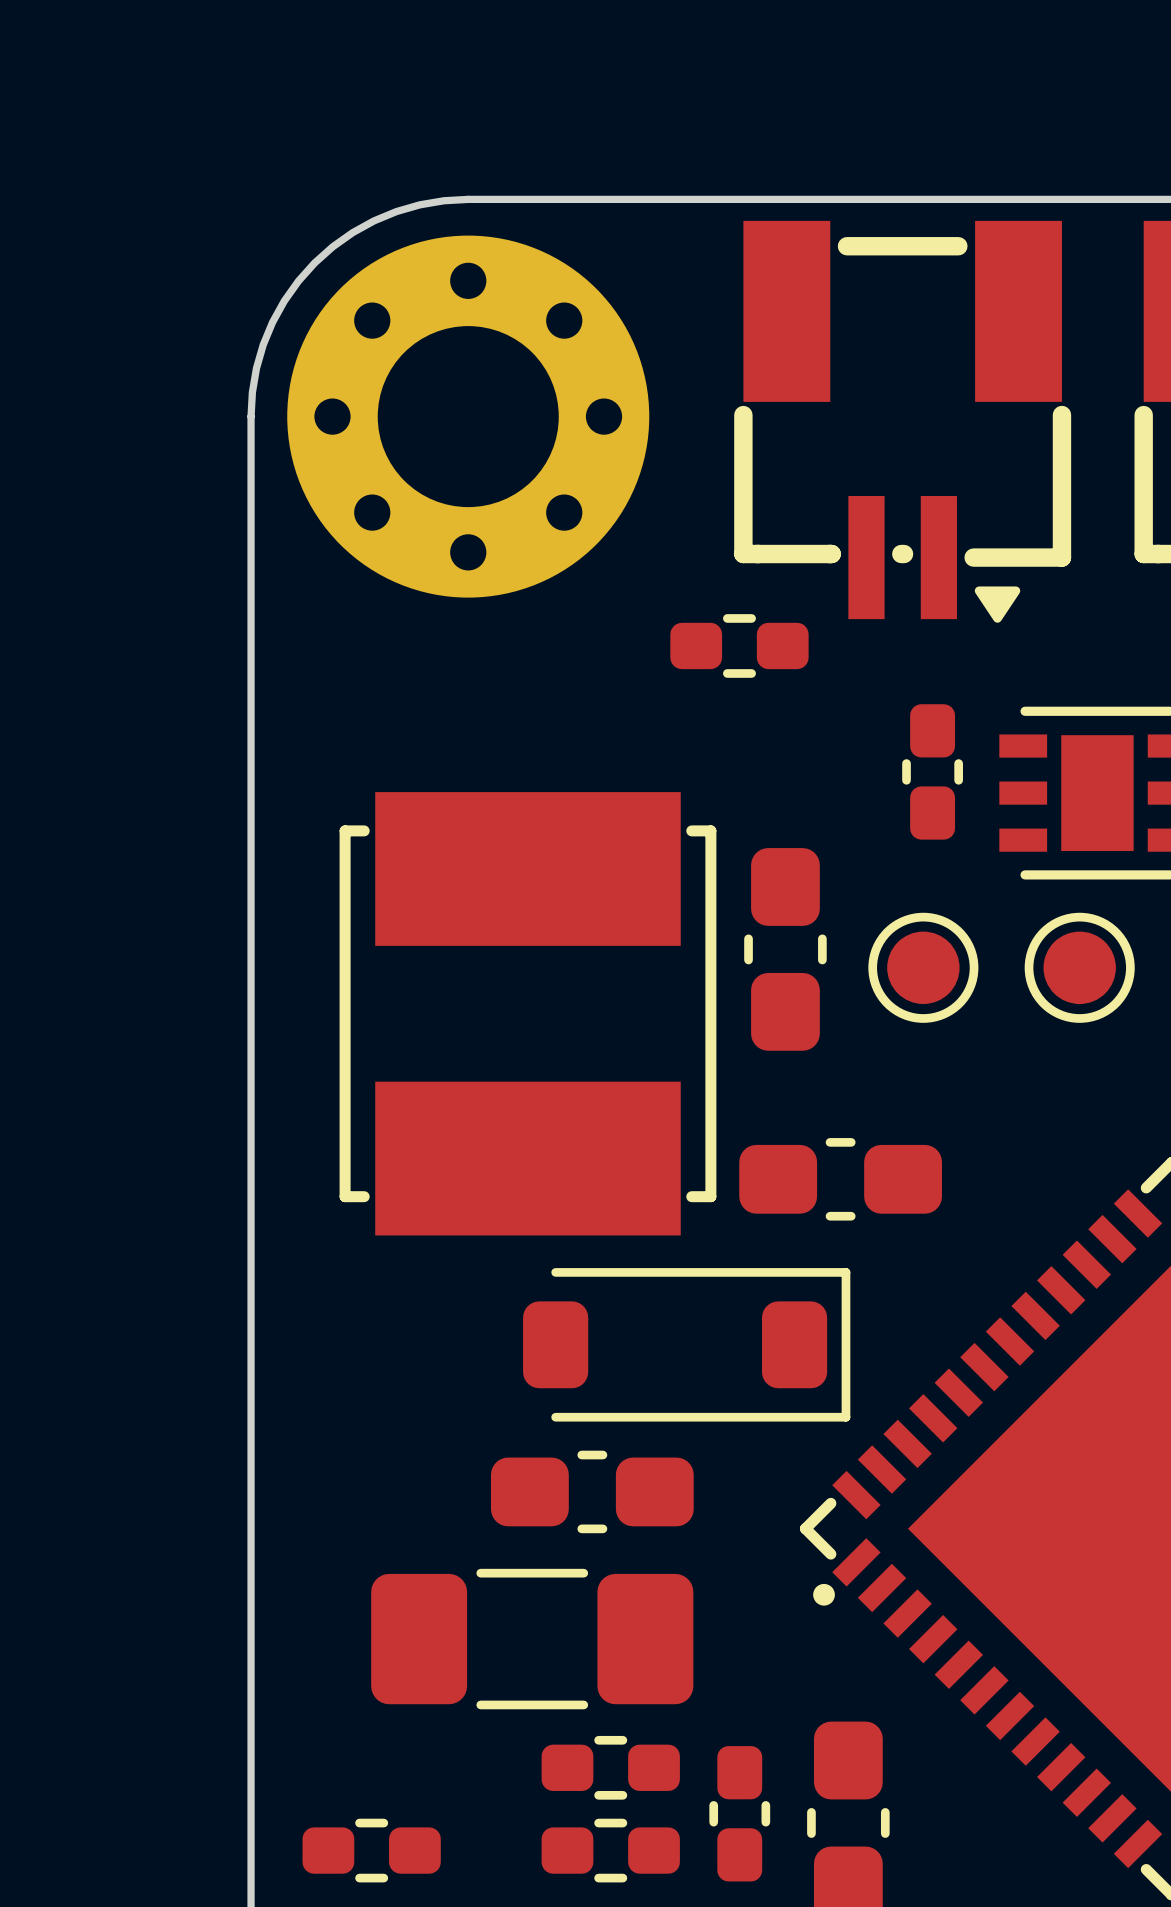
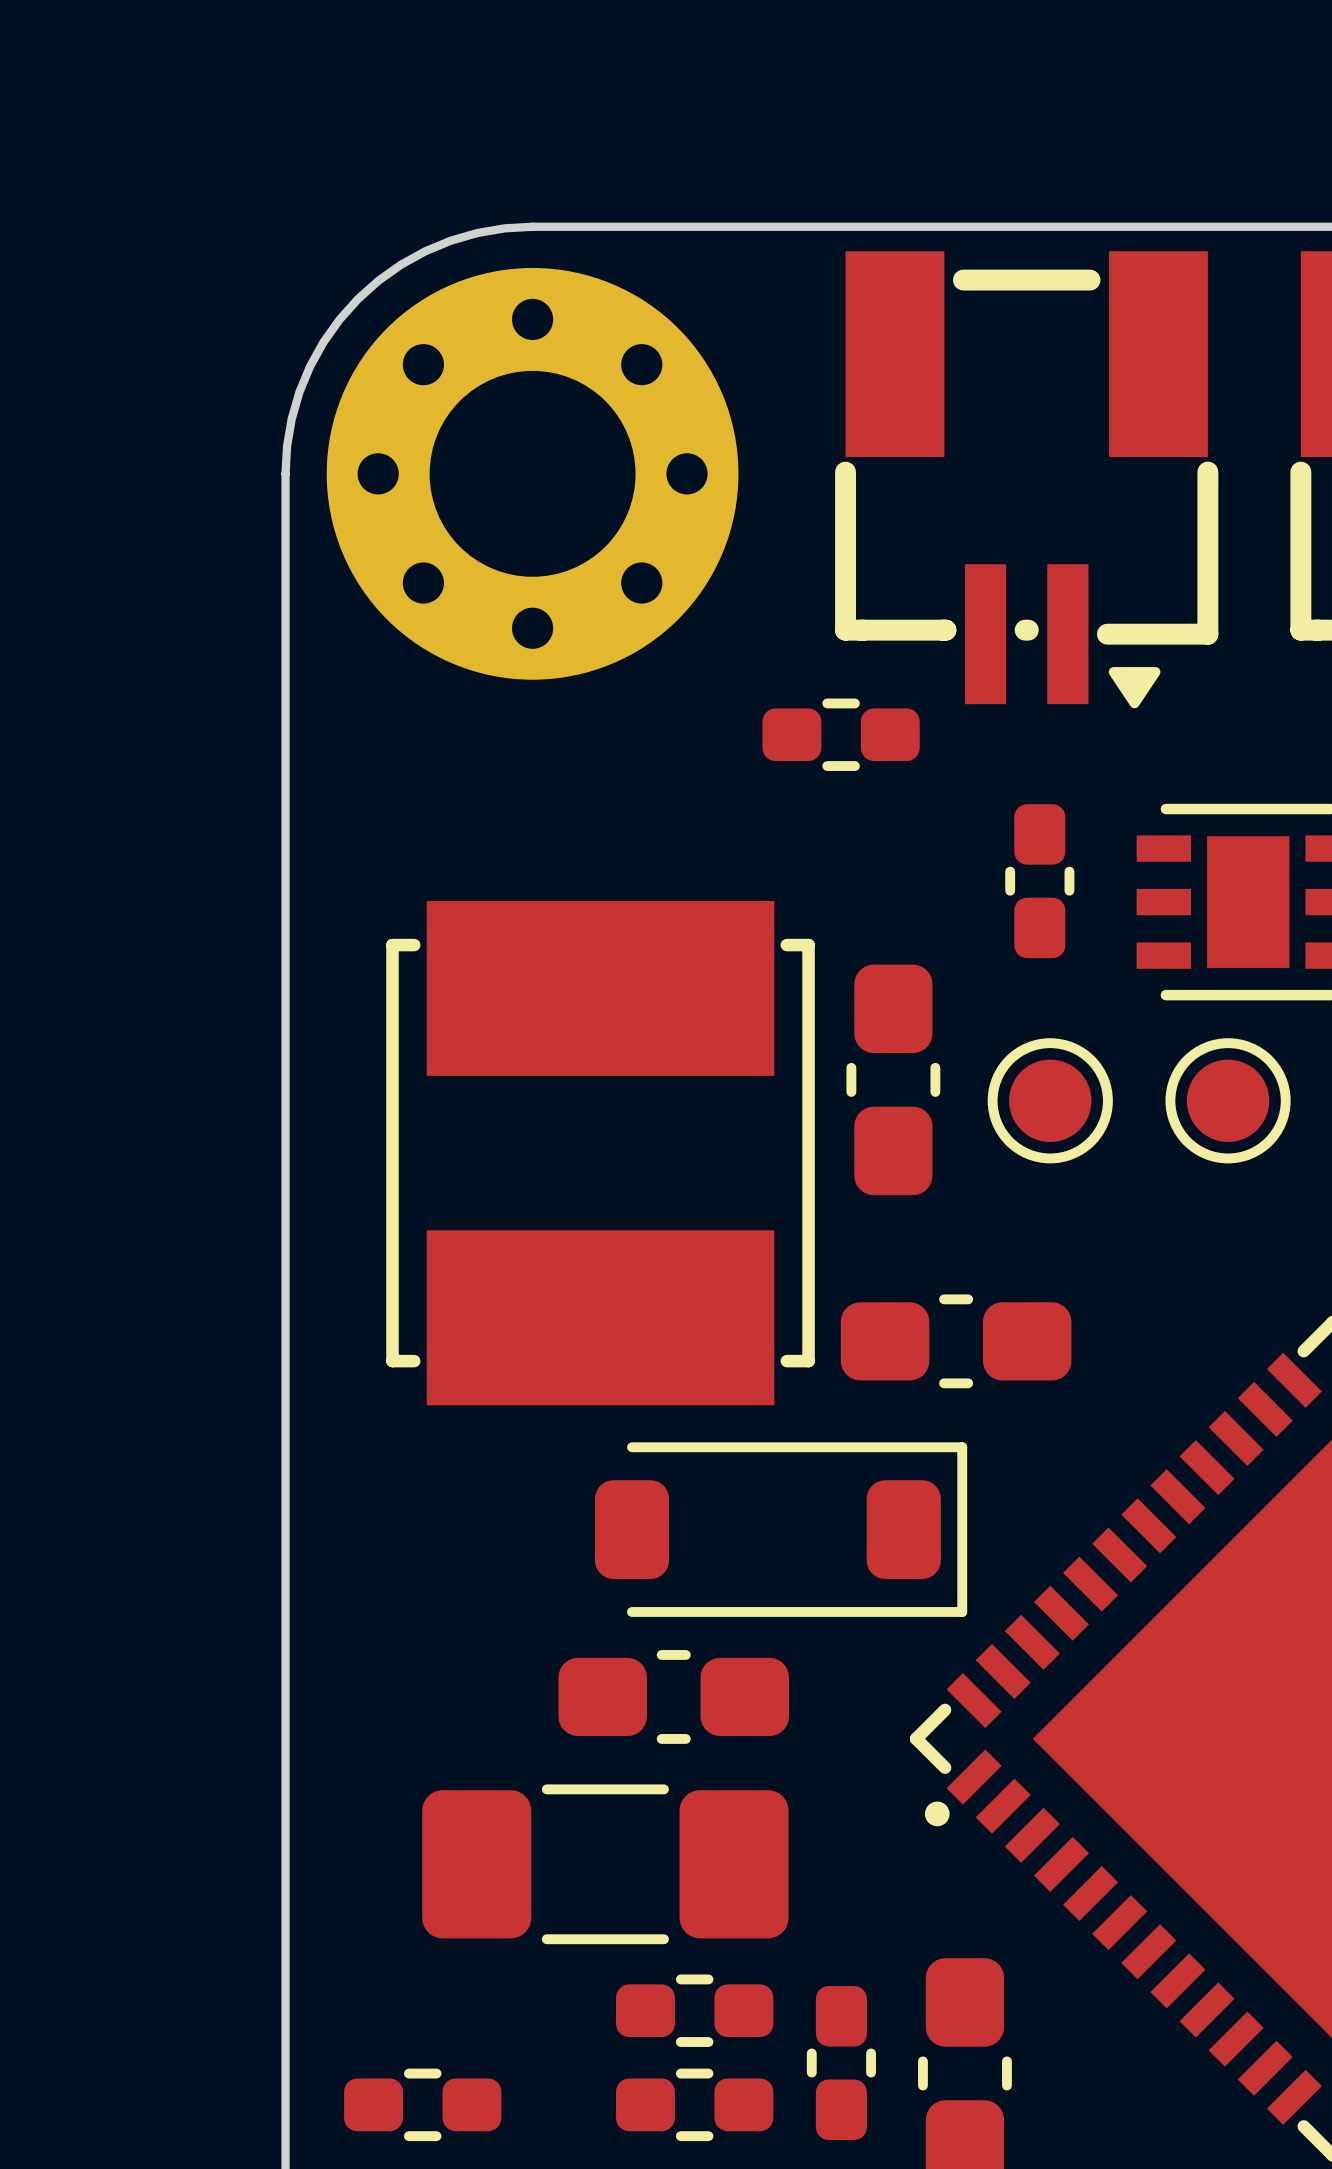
part position: (932, 771) -> (1039, 881)

